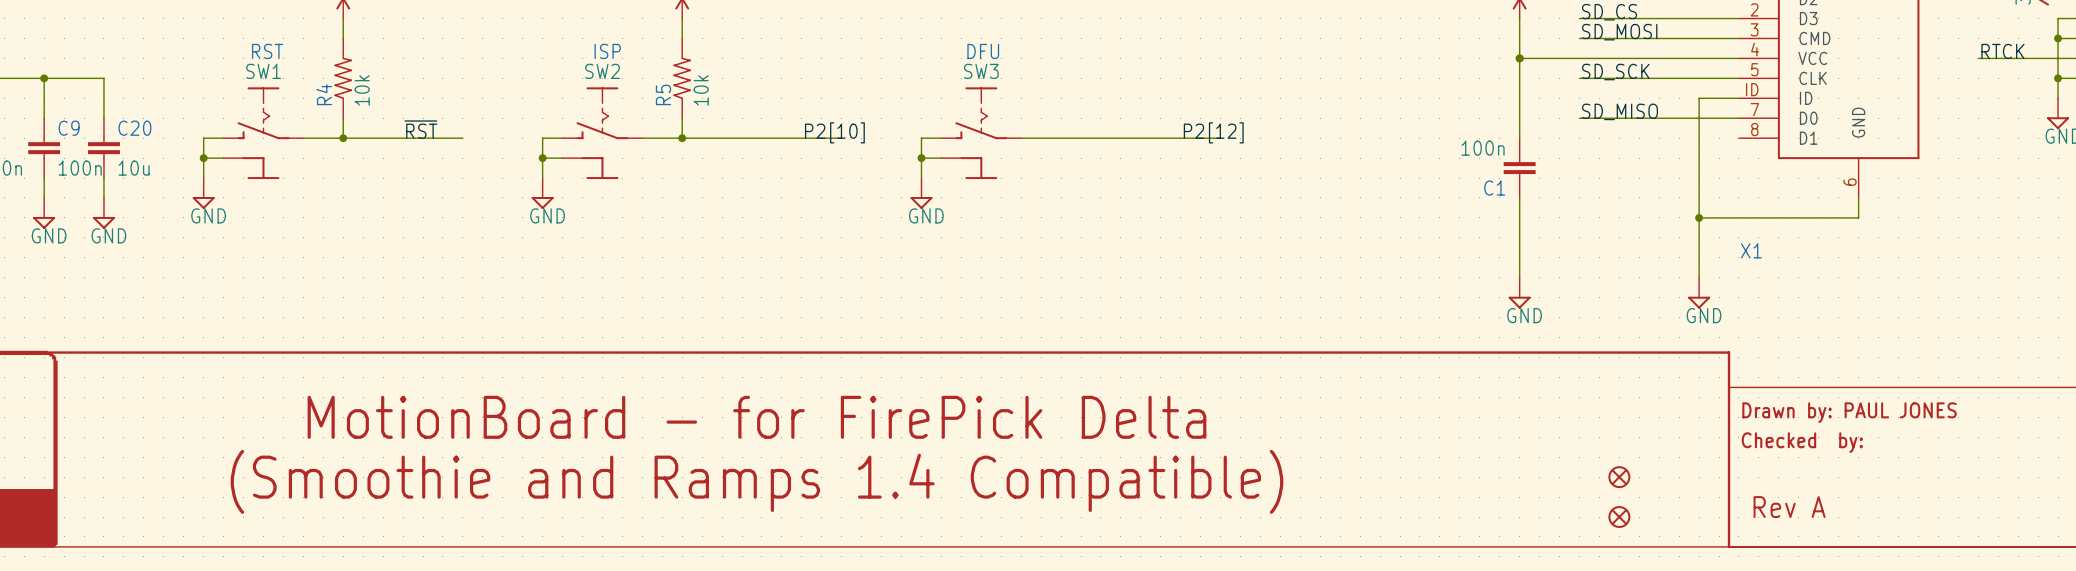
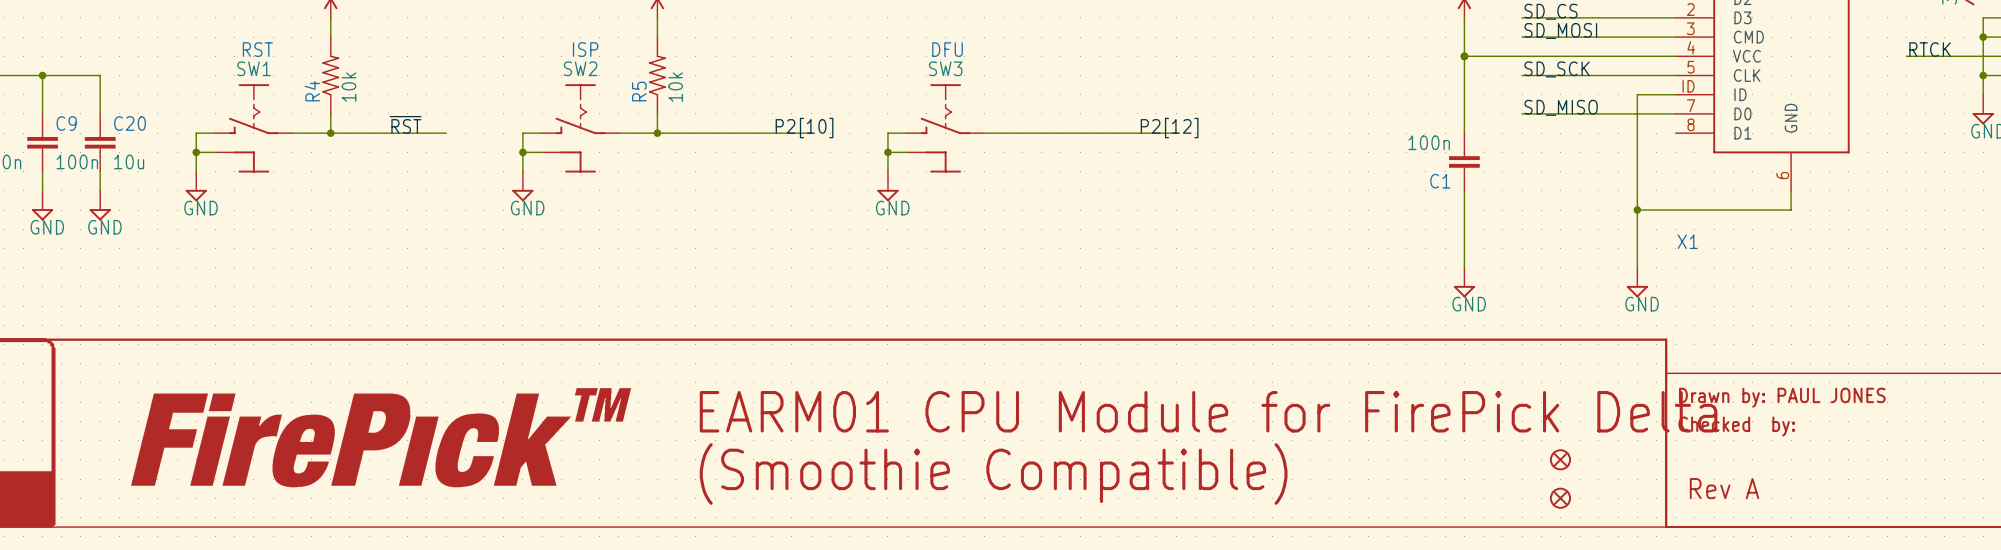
text: MotionBoard - for FirePick Delta (756, 417) -> EARM01 CPU Module for FirePick Delta (1208, 411)
part: none -> (381, 437)
text: (Smoothie and Ramps 1.4 Compatible) (756, 481) -> (Smoothie Compatible) (993, 473)

